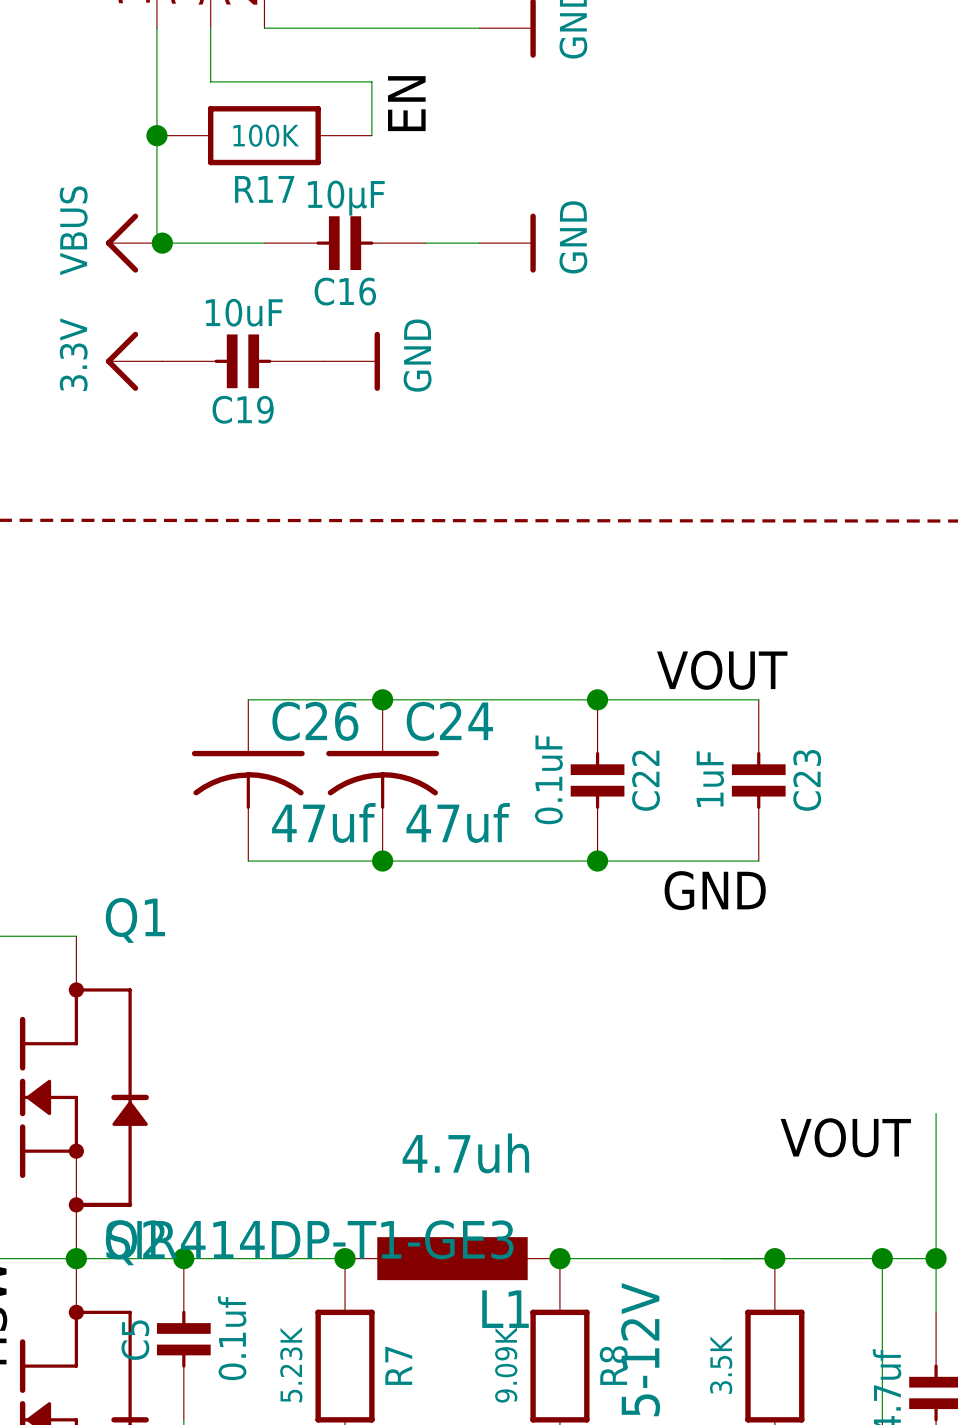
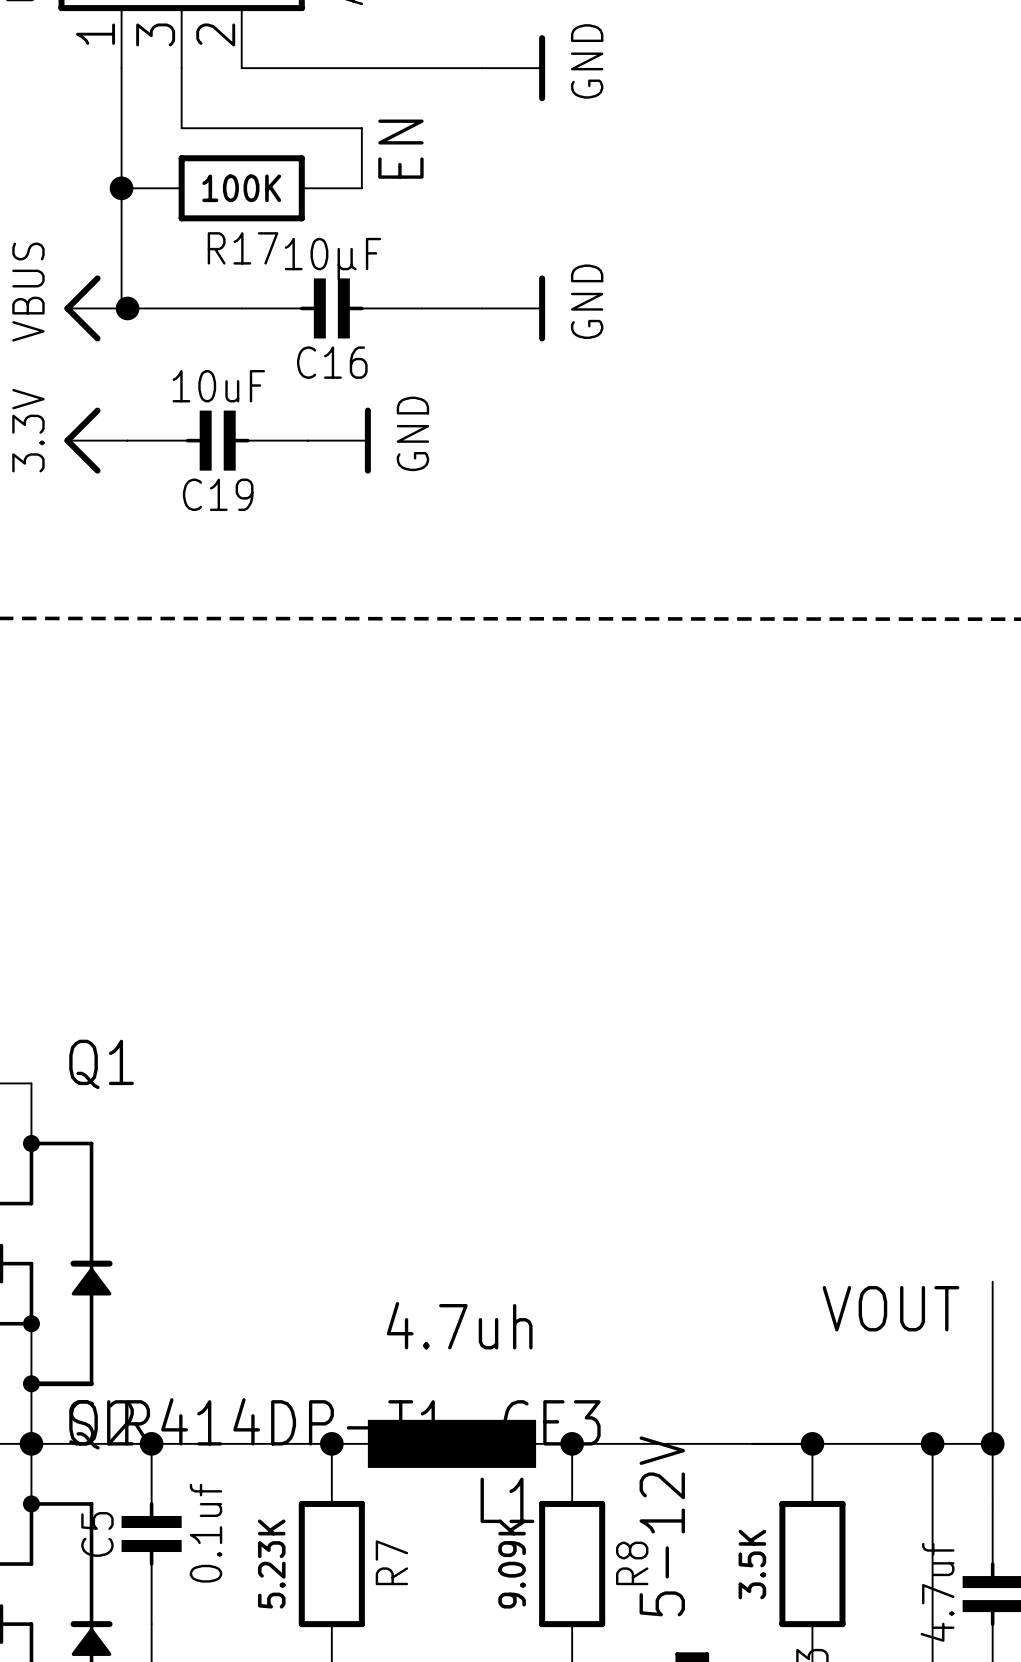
label: VOUT (722, 670) -> none
wire: (248, 699) (758, 699) -> none
junction: (382, 699) -> none
junction: (597, 699) -> none
C26: 47uf (248, 780) -> none
C24: 47uf (382, 780) -> none
C22: 0.1uF (597, 780) -> none
C23: 1uF (758, 780) -> none
wire: (248, 861) (758, 861) -> none
junction: (382, 861) -> none
junction: (597, 861) -> none
label: GND (715, 890) -> none

